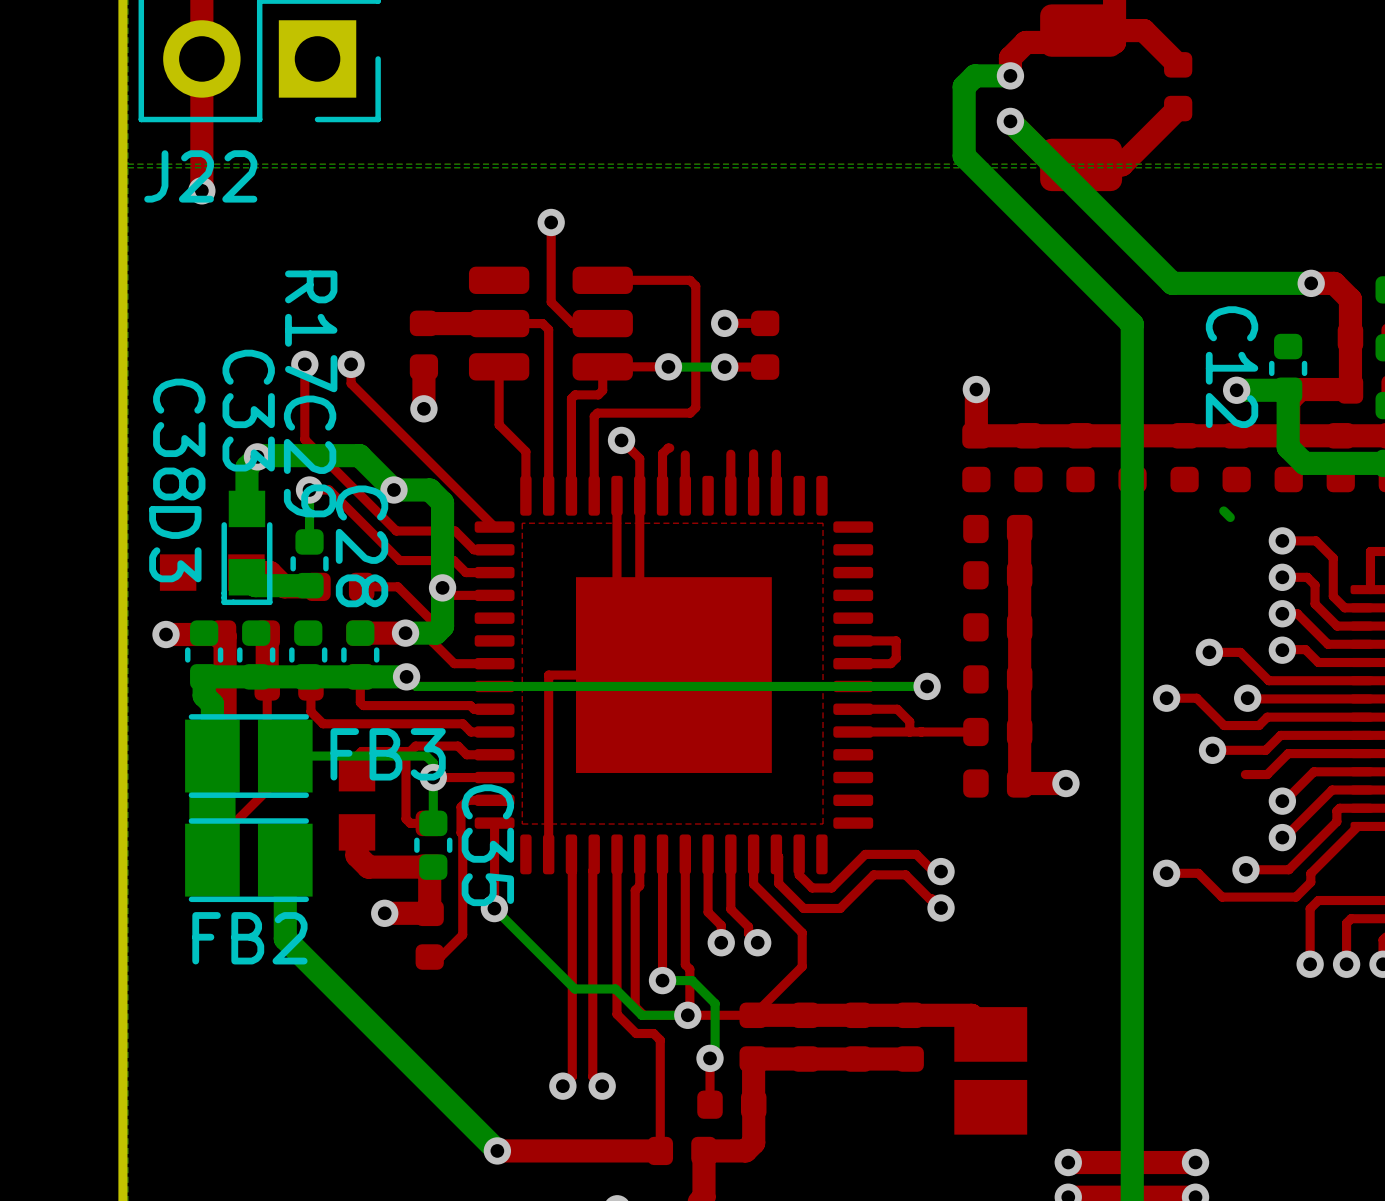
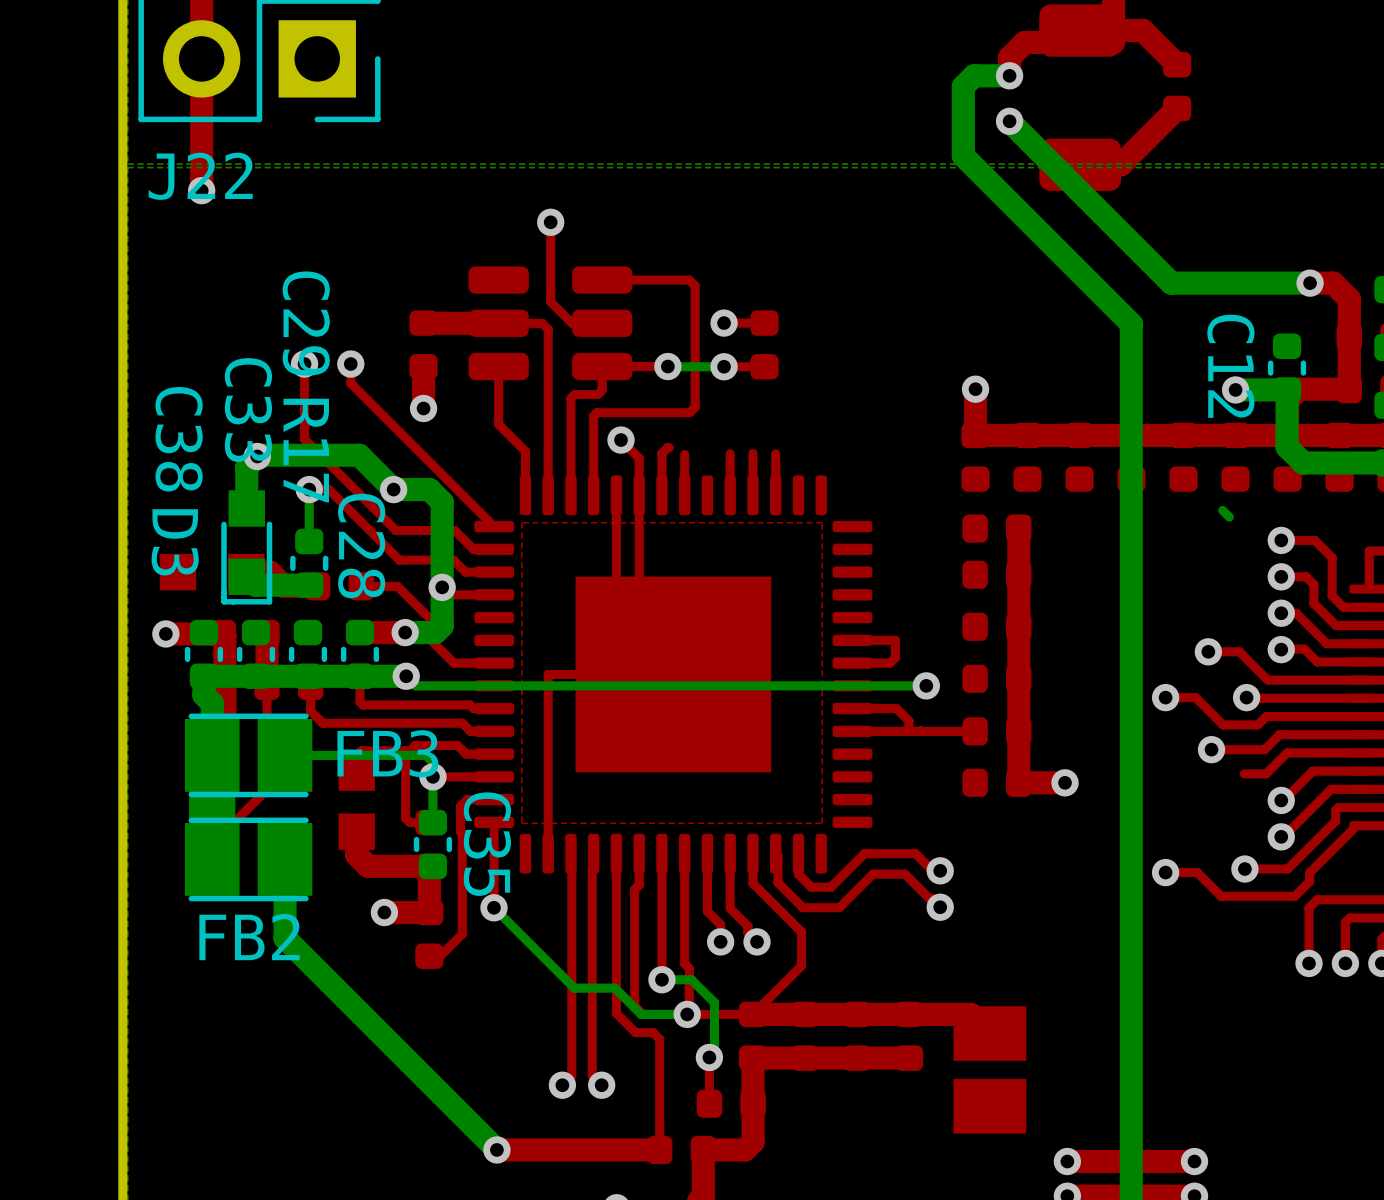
R17 name position: R17 (311, 331) -> R17 (306, 450)
C29 name position: C29 (310, 456) -> C29 (306, 323)

